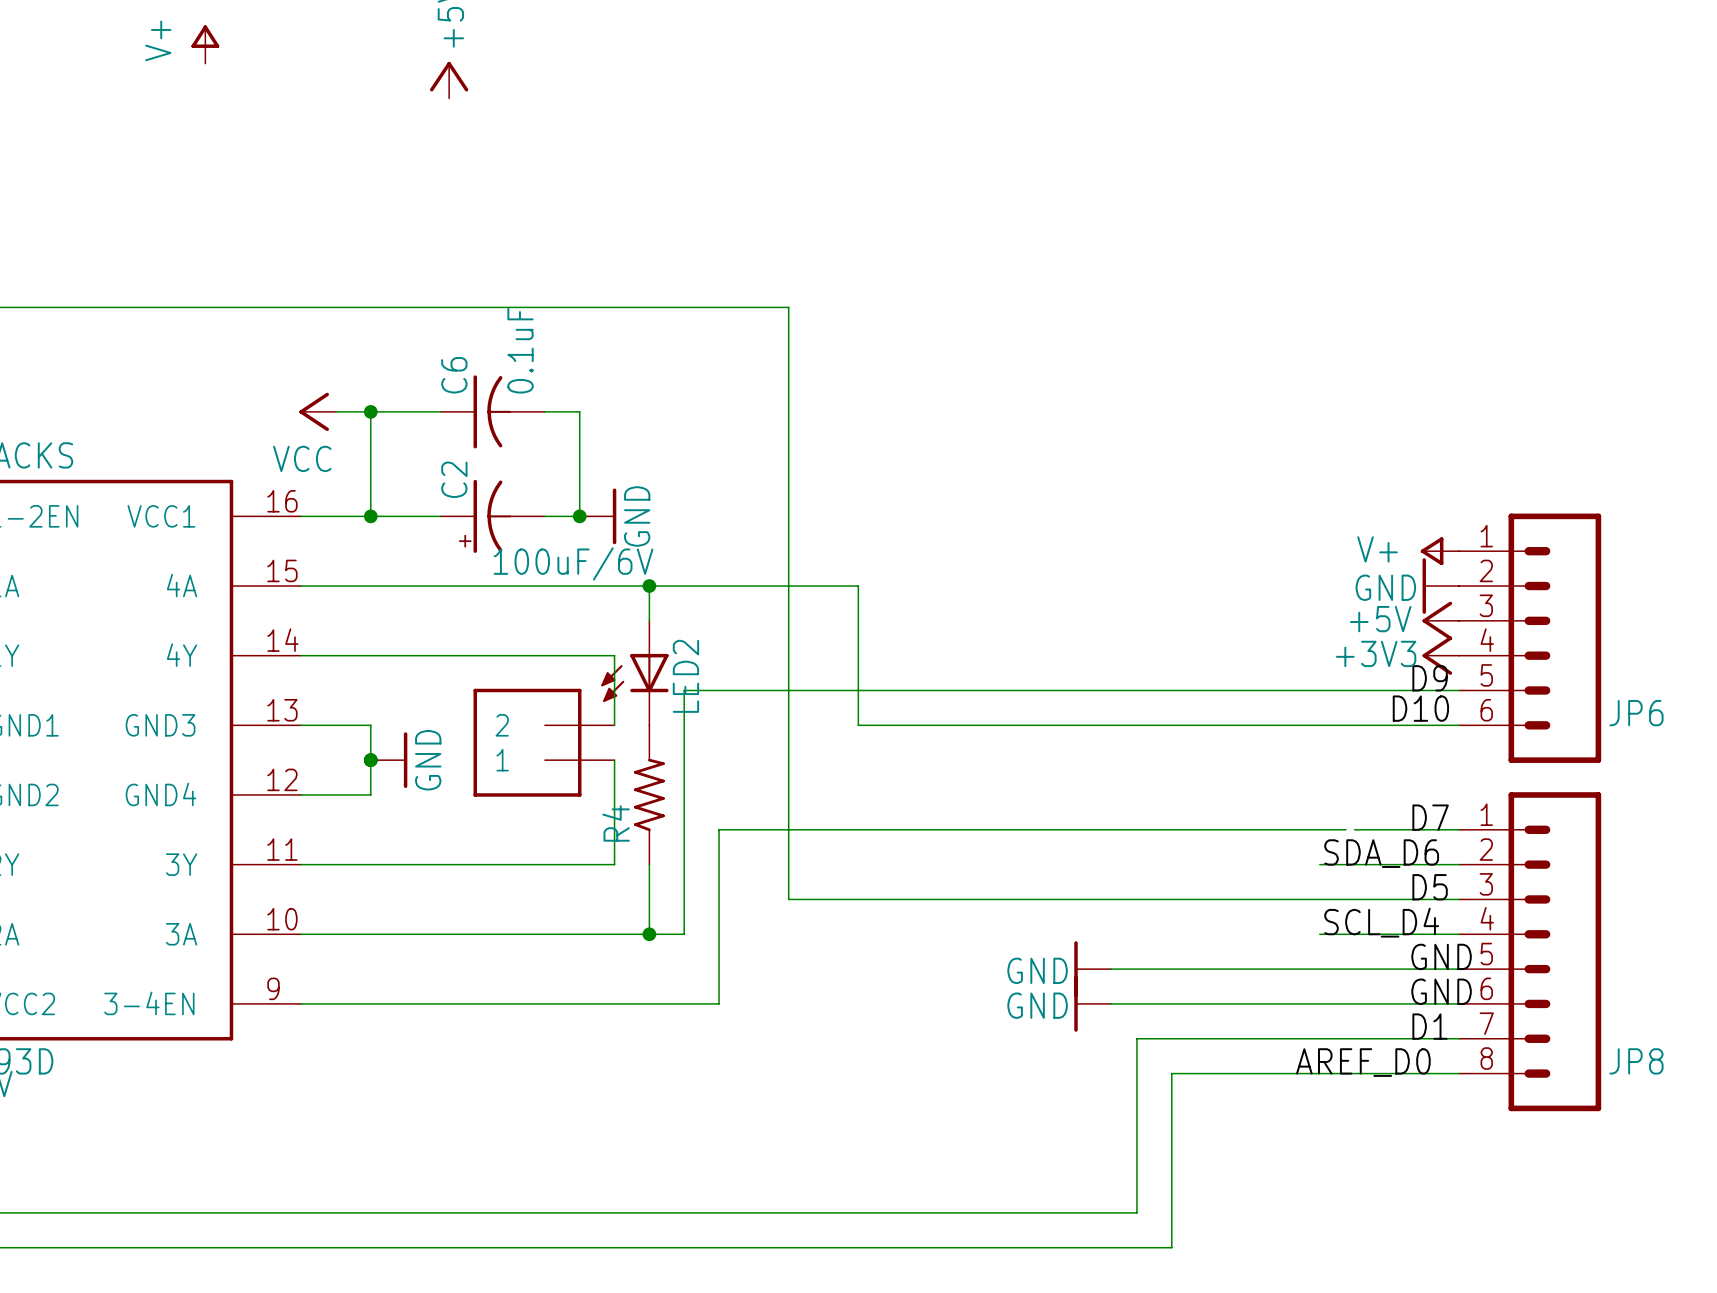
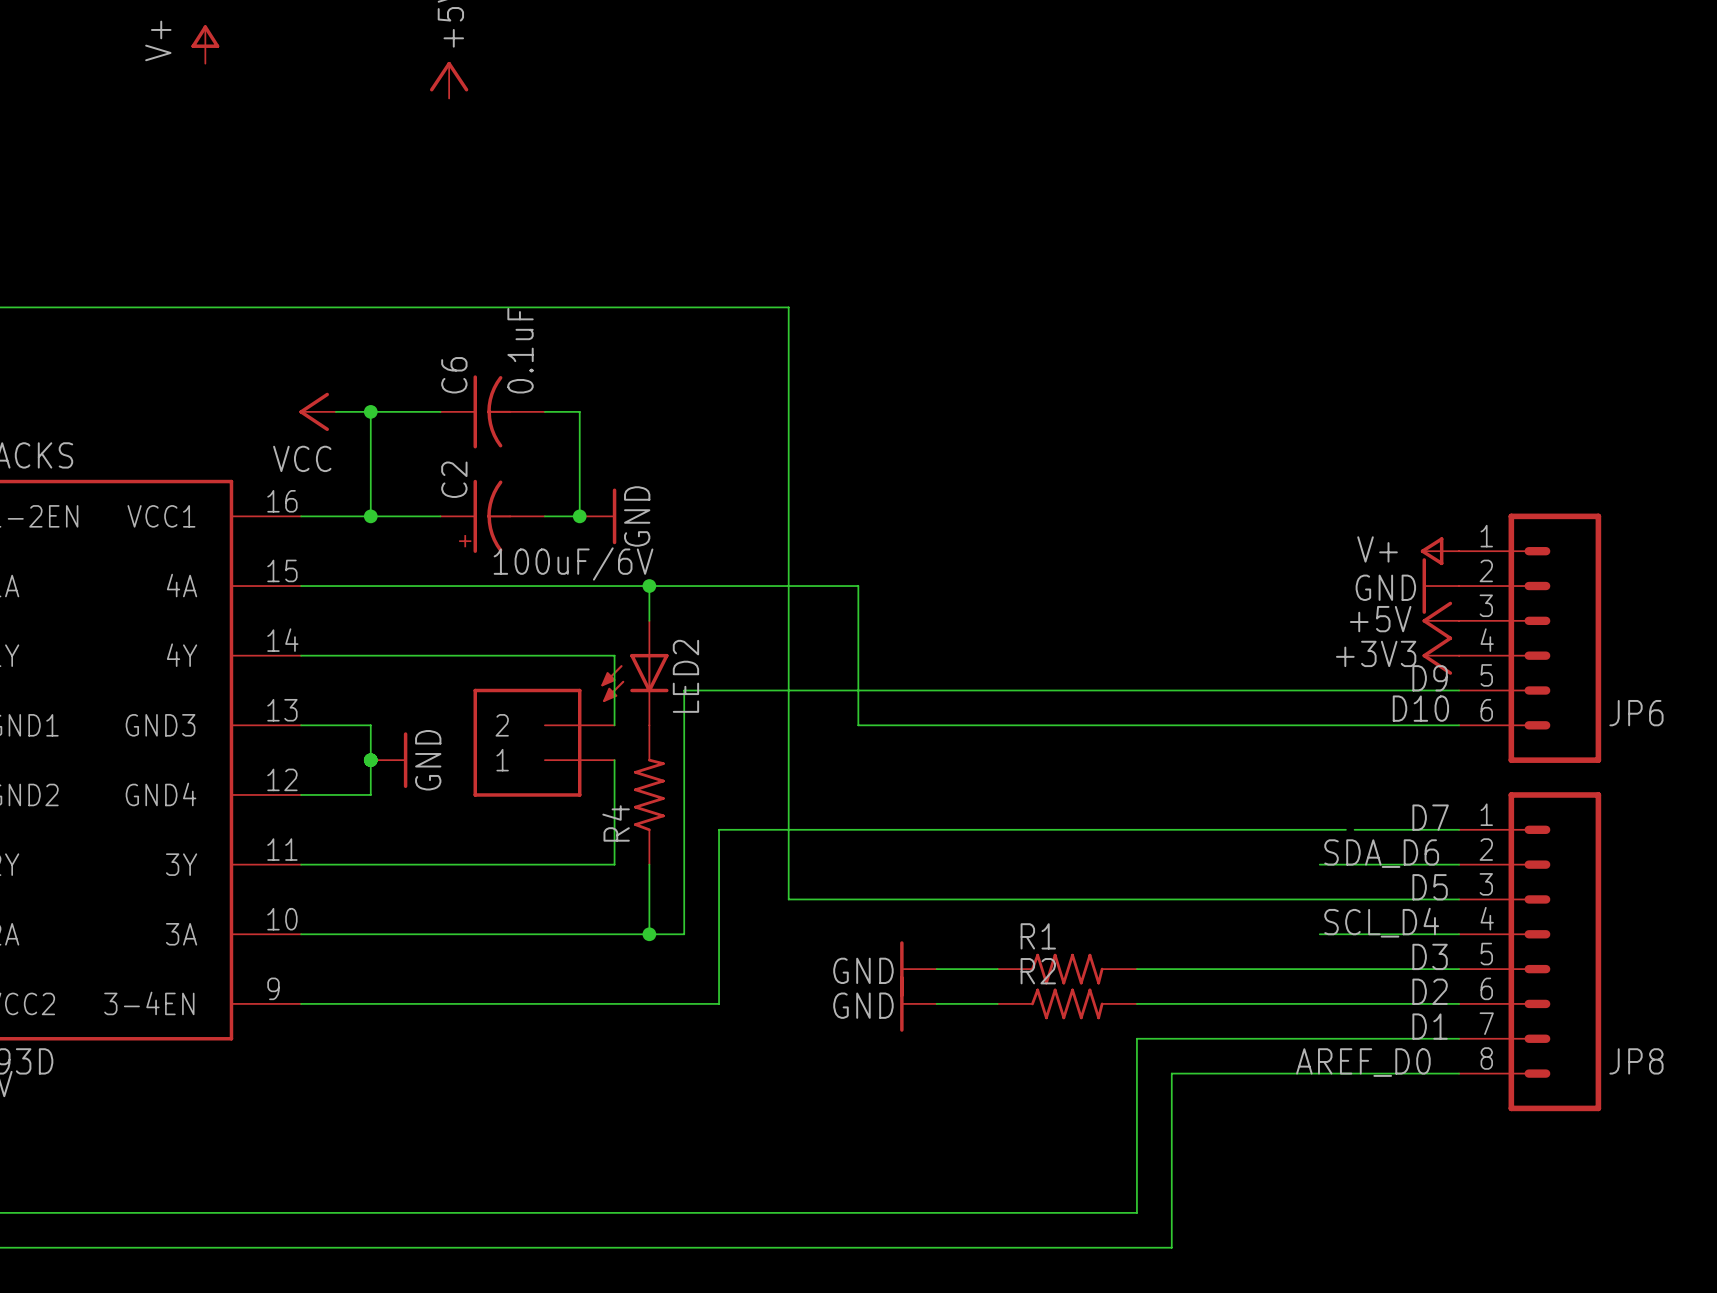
label: GND (1441, 956) -> D3 (1430, 956)
power symbol: none -> GND (918, 969)
wire: none -> (936, 969) (997, 969)
R1: none -> (1067, 969)
power symbol: GND (1092, 969) -> none
label: GND (1441, 991) -> D2 (1430, 991)
power symbol: none -> GND (918, 1003)
wire: none -> (936, 1003) (997, 1003)
R2: none -> (1067, 1003)
power symbol: GND (1092, 1003) -> none

